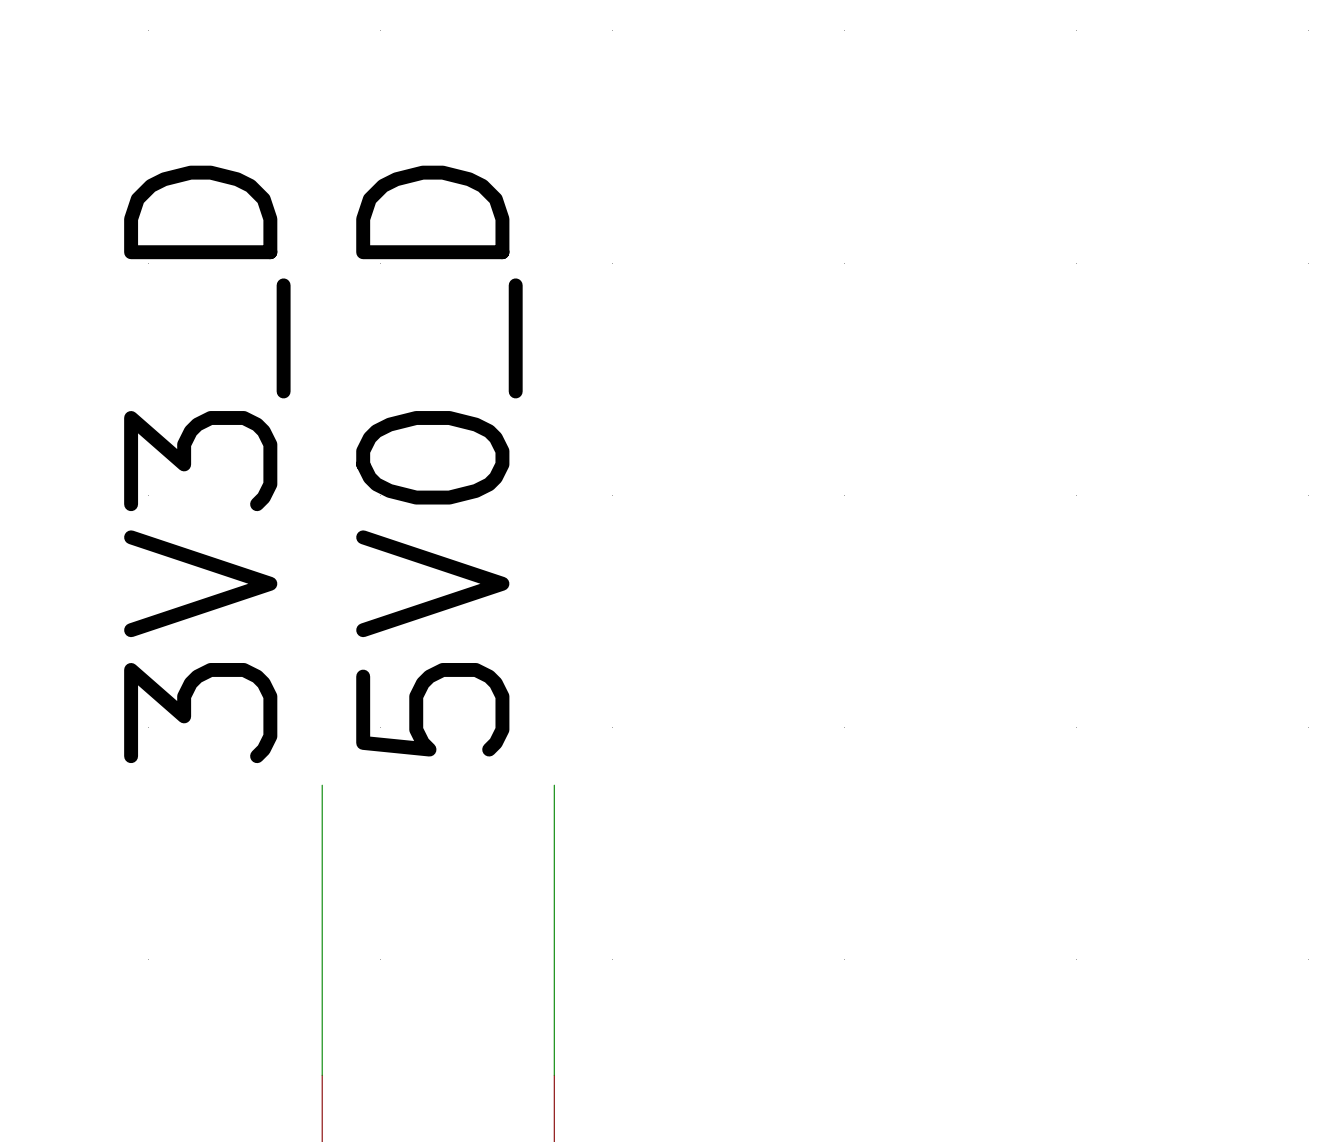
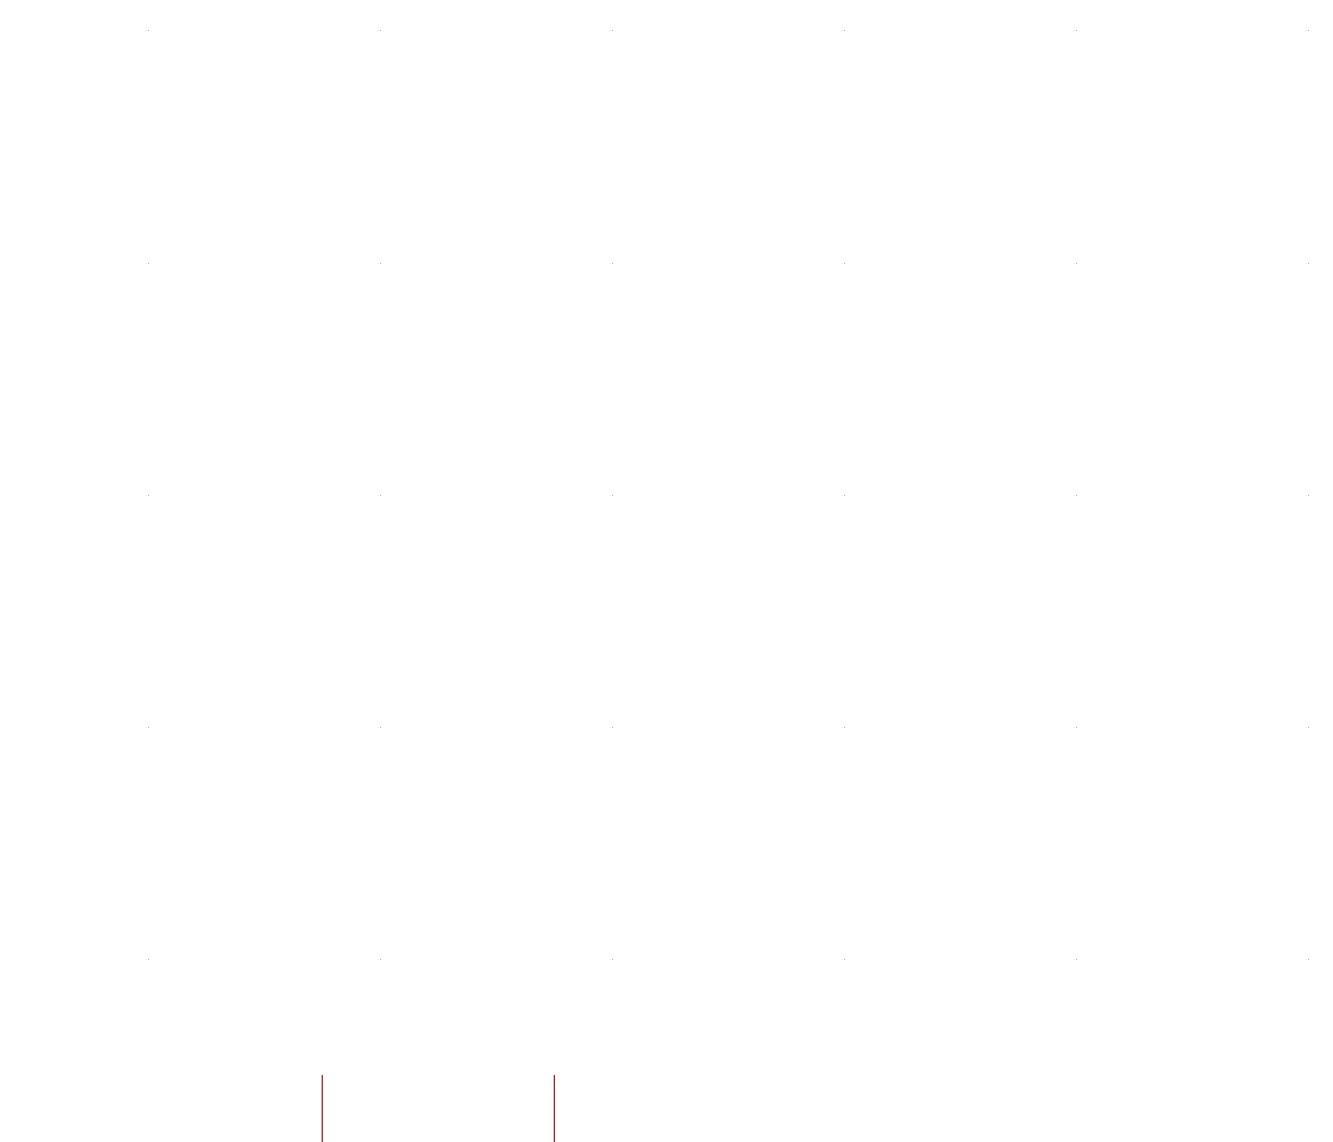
label: 5V0_D (439, 461) -> none
label: 3V3_D (207, 464) -> none
wire: (322, 785) (322, 1075) -> none
wire: (554, 785) (554, 1075) -> none

